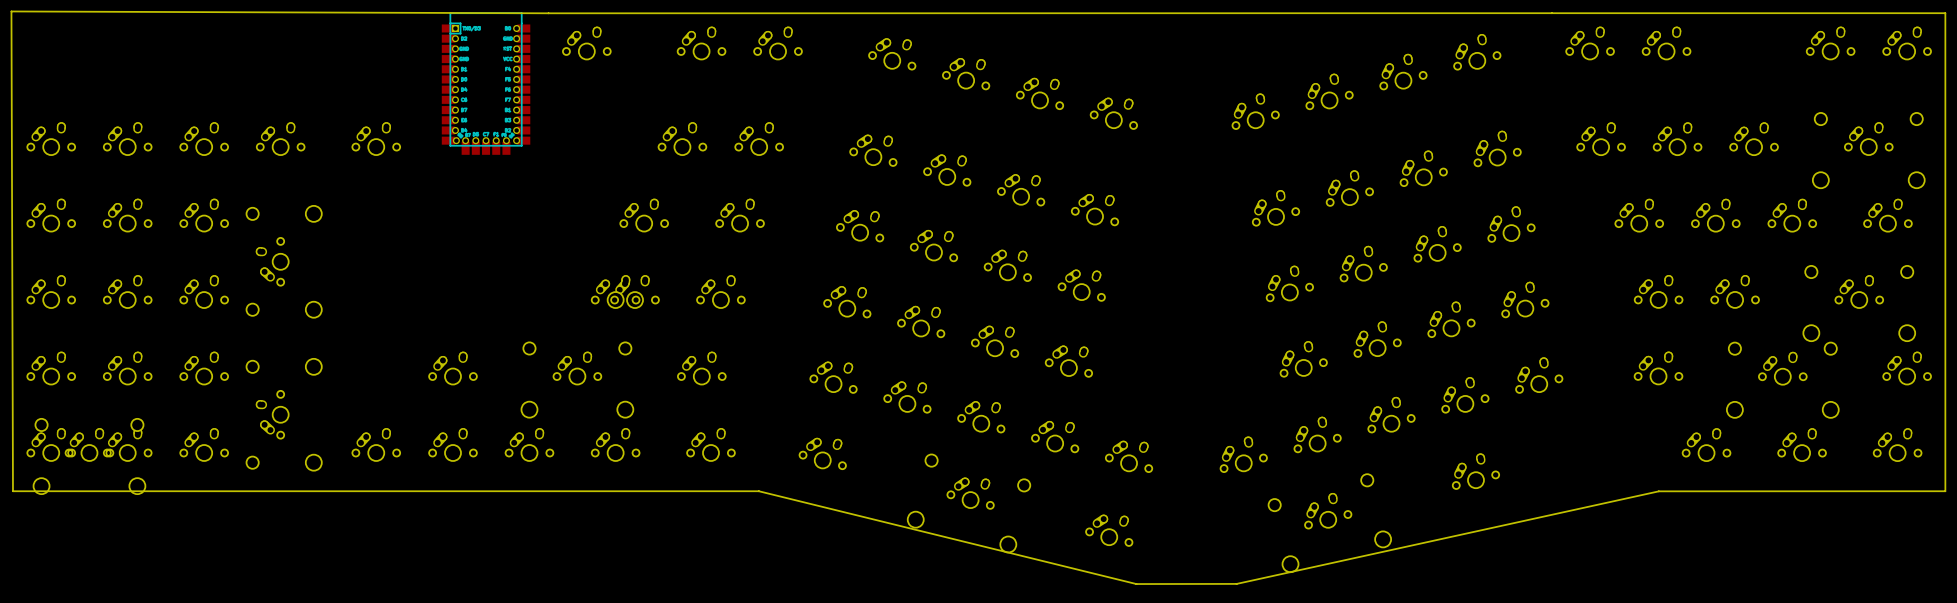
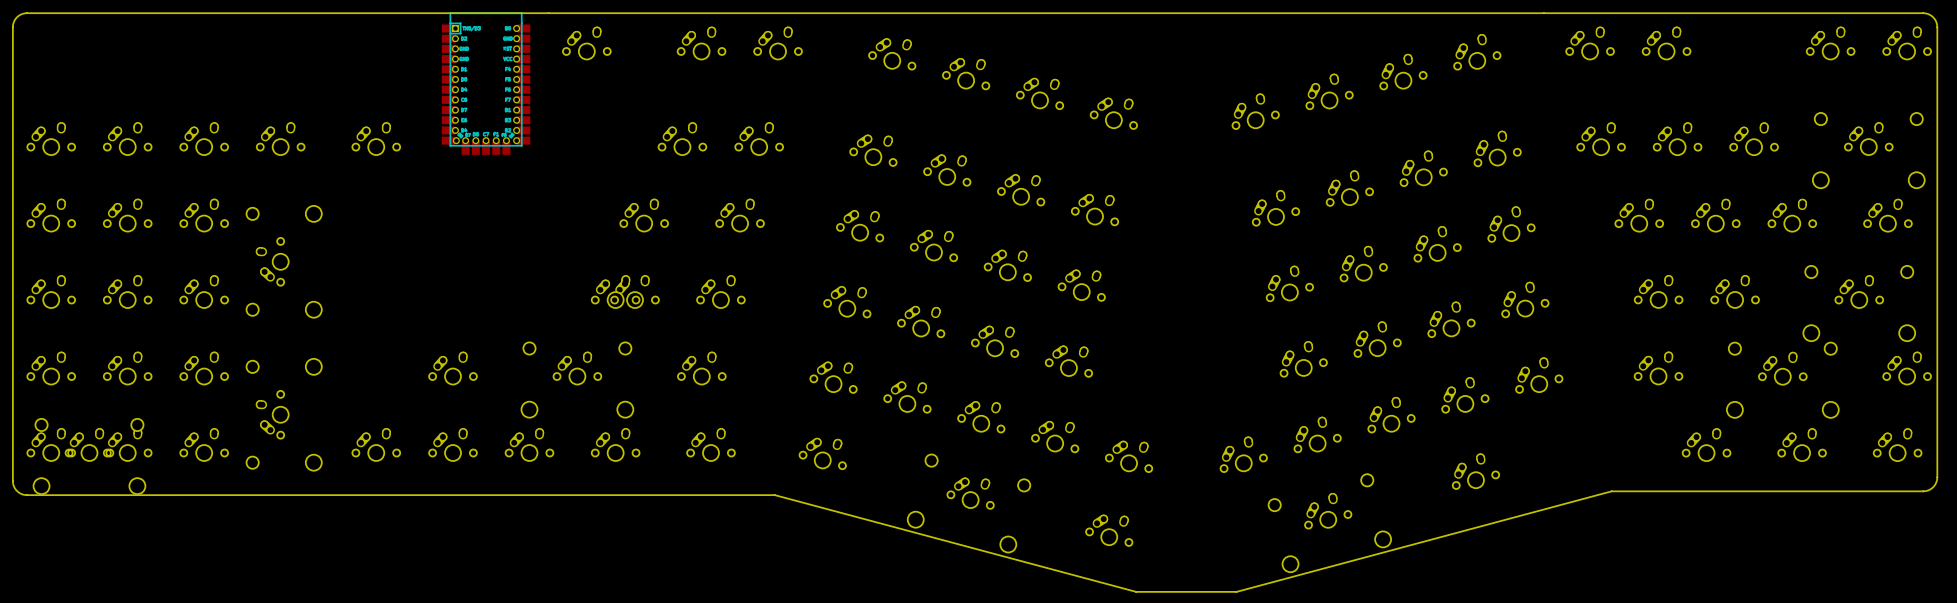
board edge: (1551, 13) (11, 11) (12, 491) (758, 491) (1136, 584) (1236, 583) (1658, 491) (1945, 491) (1945, 13) (1923, 13) -> (1551, 13) (23, 13) (15, 18) (12, 27) (13, 485) (18, 492) (26, 495) (774, 495) (1136, 591) (1236, 591) (1611, 491) (1926, 490) (1934, 485) (1937, 477) (1937, 27) (1933, 17) (1923, 13)

